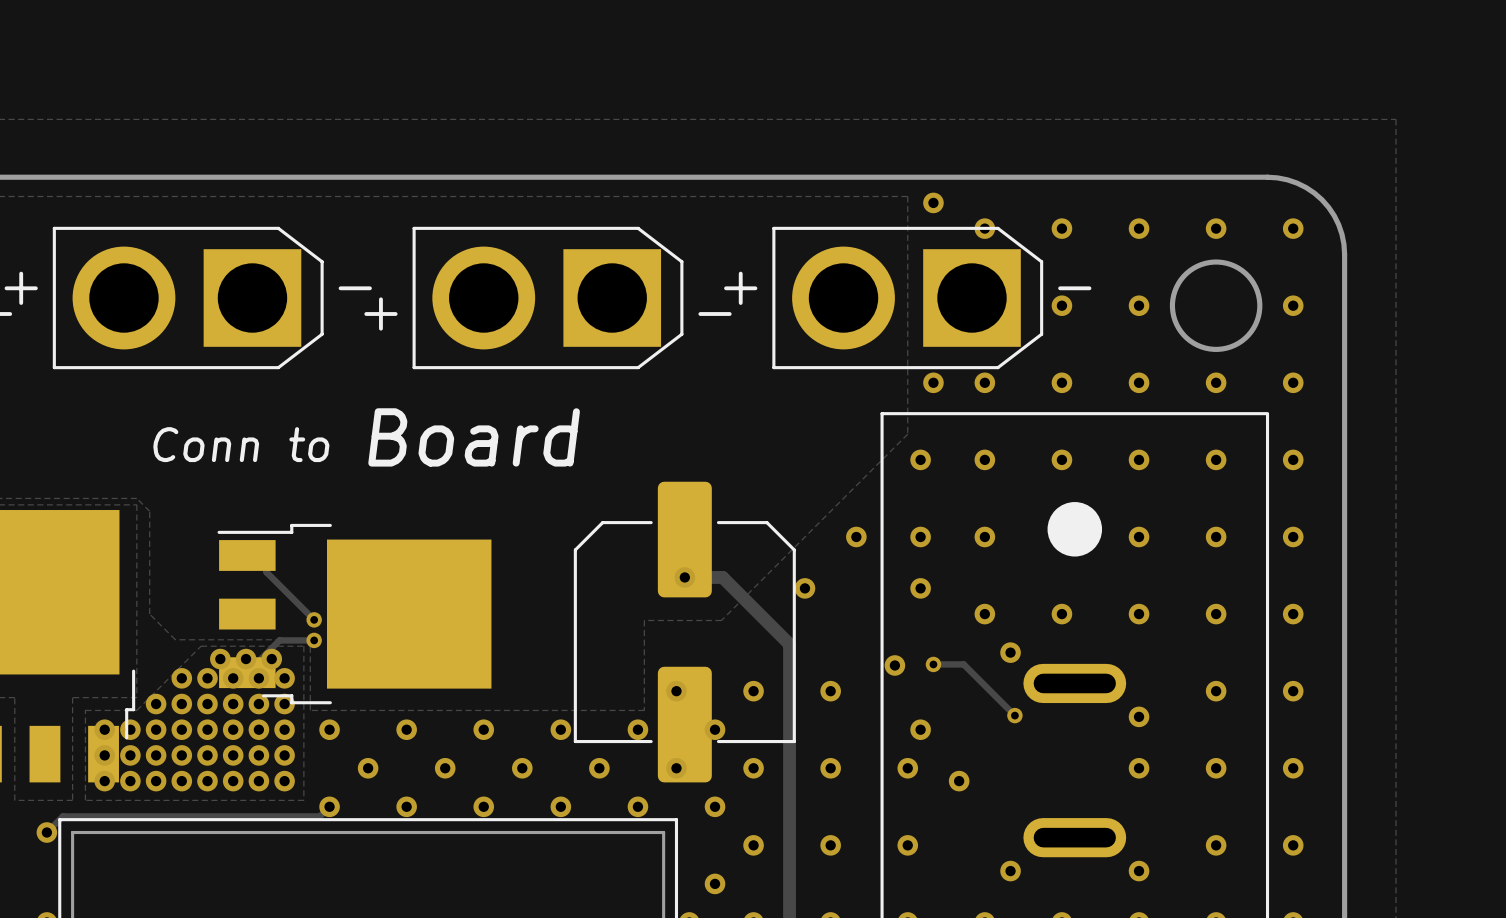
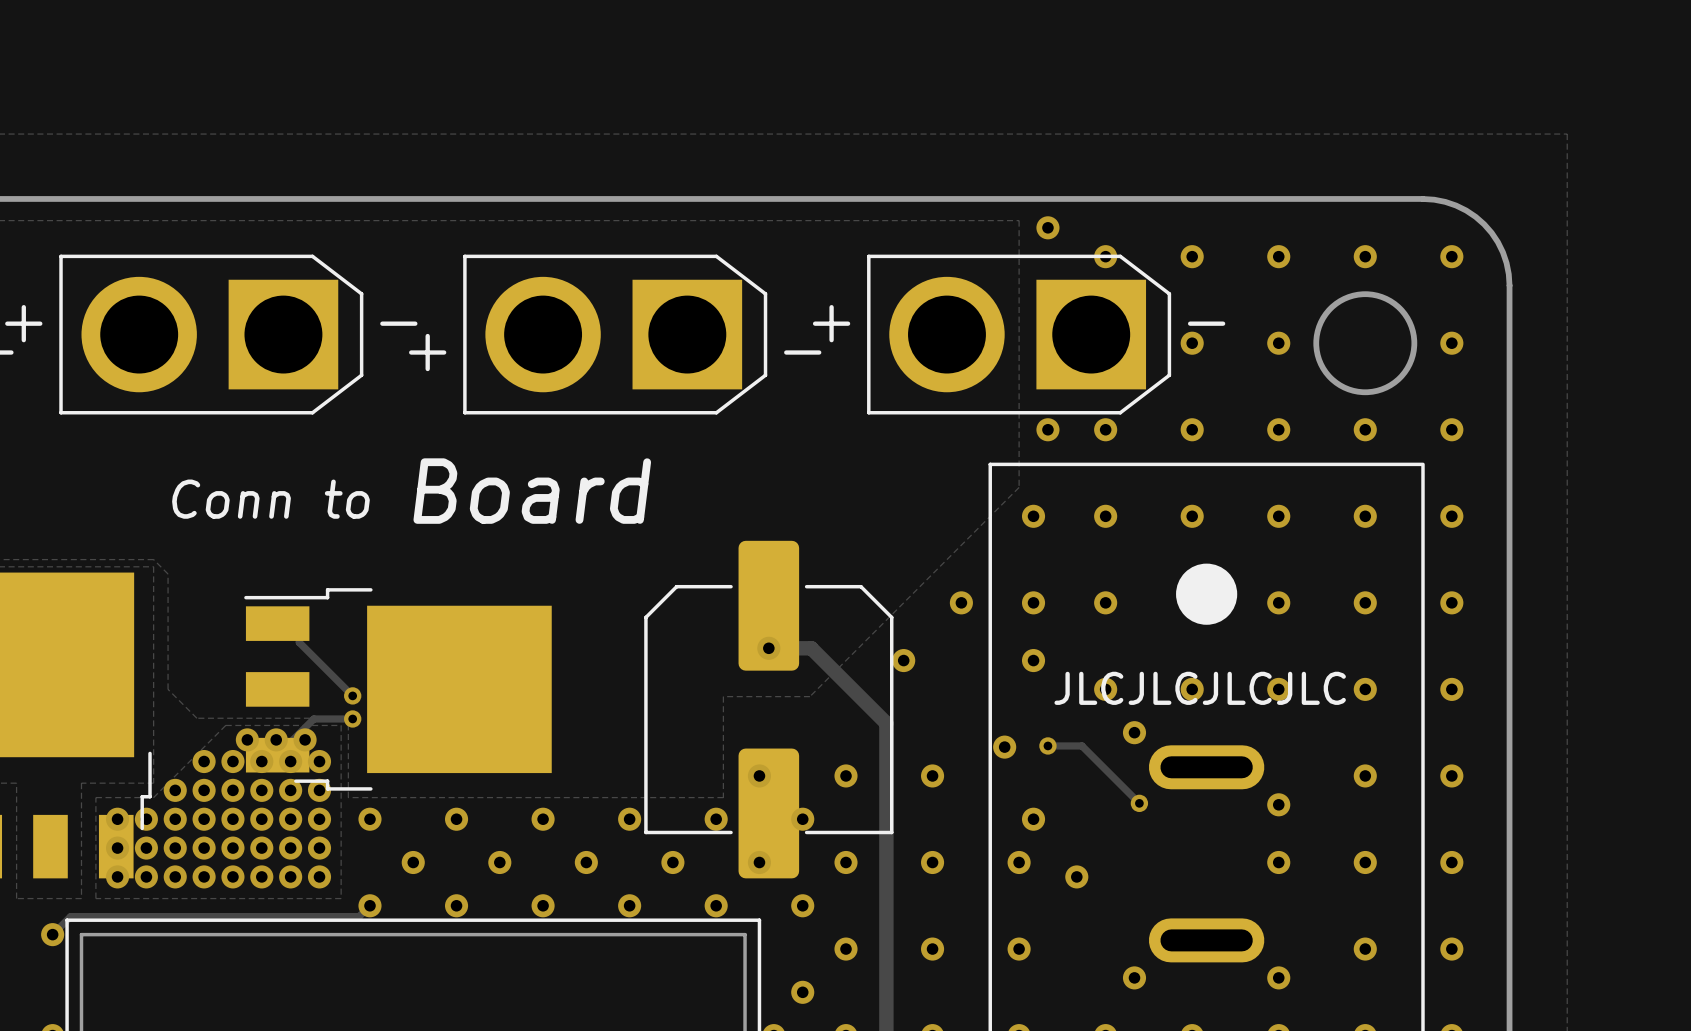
text: none -> JLCJLCJLCJLC (1200, 688)

